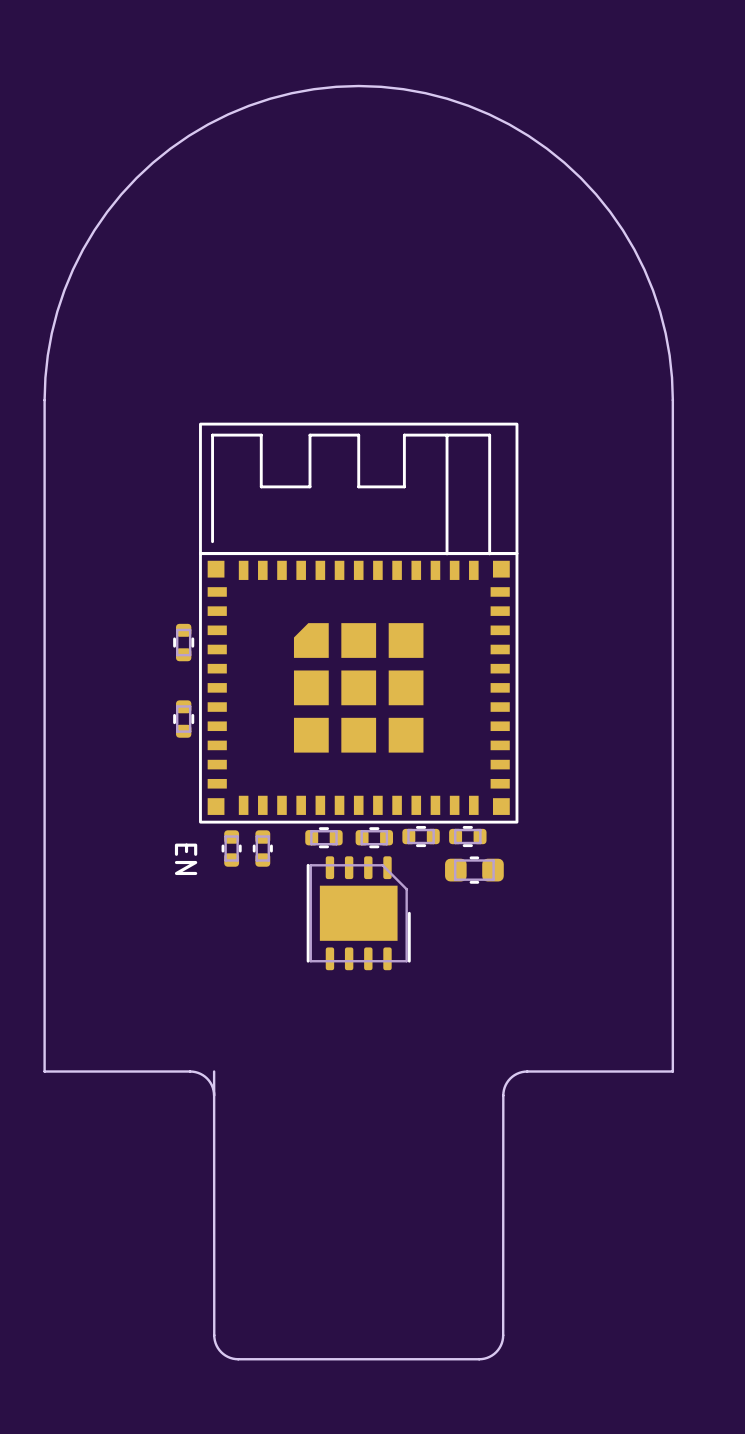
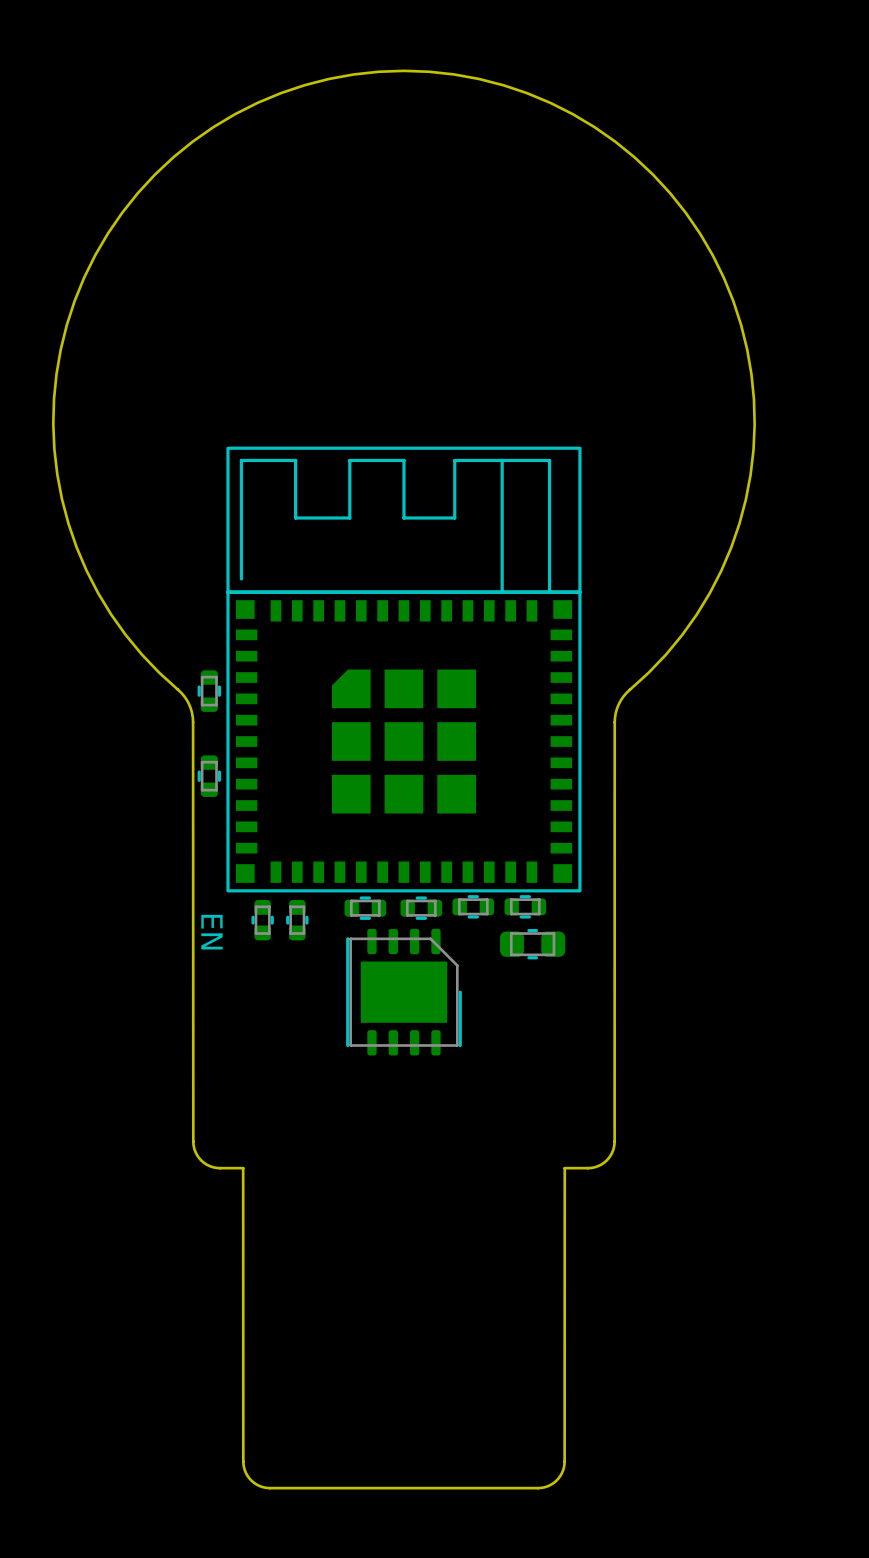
board edge: (214, 1095) (208, 1080) (200, 1073) (192, 1071) (44, 1071) (44, 400) (47, 355) (51, 333) (57, 311) (72, 269) (83, 249) (107, 211) (136, 178) (170, 148) (188, 135) (228, 114) (248, 105) (270, 98) (314, 89) (358, 86) (403, 89) (425, 93) (468, 105) (509, 124) (528, 135) (564, 162) (596, 194) (622, 230) (644, 269) (660, 311) (665, 333) (672, 377) (672, 1071) (524, 1071) (514, 1075) (506, 1082) (503, 1095) (503, 1335) -> (243, 1168) (217, 1167) (208, 1165) (197, 1155) (193, 1144) (192, 712) (184, 696) (141, 654) (111, 614) (86, 570) (76, 547) (62, 499) (54, 449) (53, 399) (60, 349) (66, 325) (84, 277) (107, 233) (137, 193) (155, 174) (173, 157) (213, 127) (235, 114) (280, 93) (304, 85) (353, 74) (404, 70) (429, 71) (479, 78) (503, 85) (550, 102) (594, 127) (634, 157) (670, 193) (700, 233) (723, 277) (741, 325) (747, 349) (753, 399) (754, 424) (750, 474) (739, 523) (721, 570) (709, 593) (682, 635) (648, 672) (623, 696) (615, 713) (614, 1144) (610, 1155) (599, 1165) (590, 1167) (564, 1168) (564, 1461)

